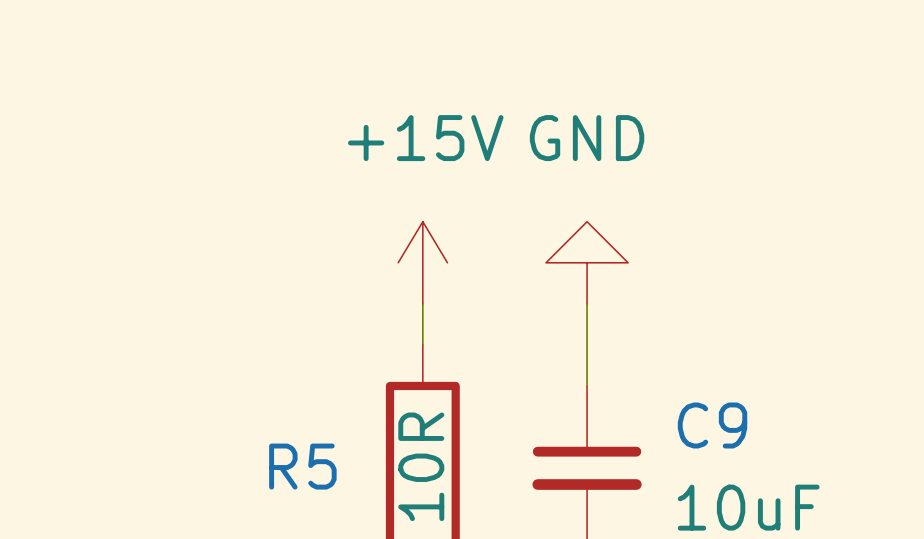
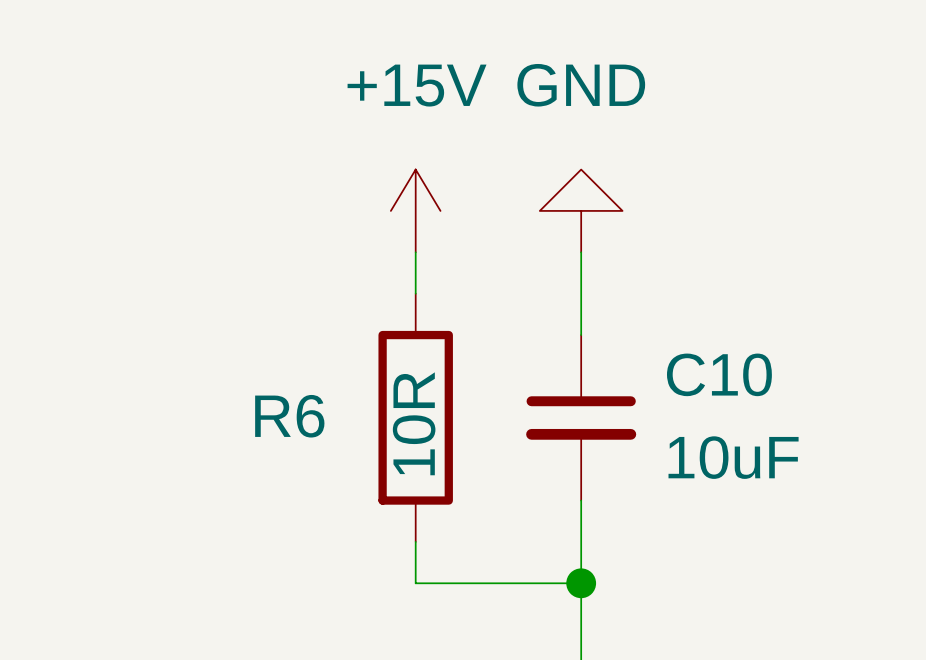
C9 name: C9 (712, 425) -> C10 (719, 374)
R5 name: R5 (302, 466) -> R6 (289, 416)

